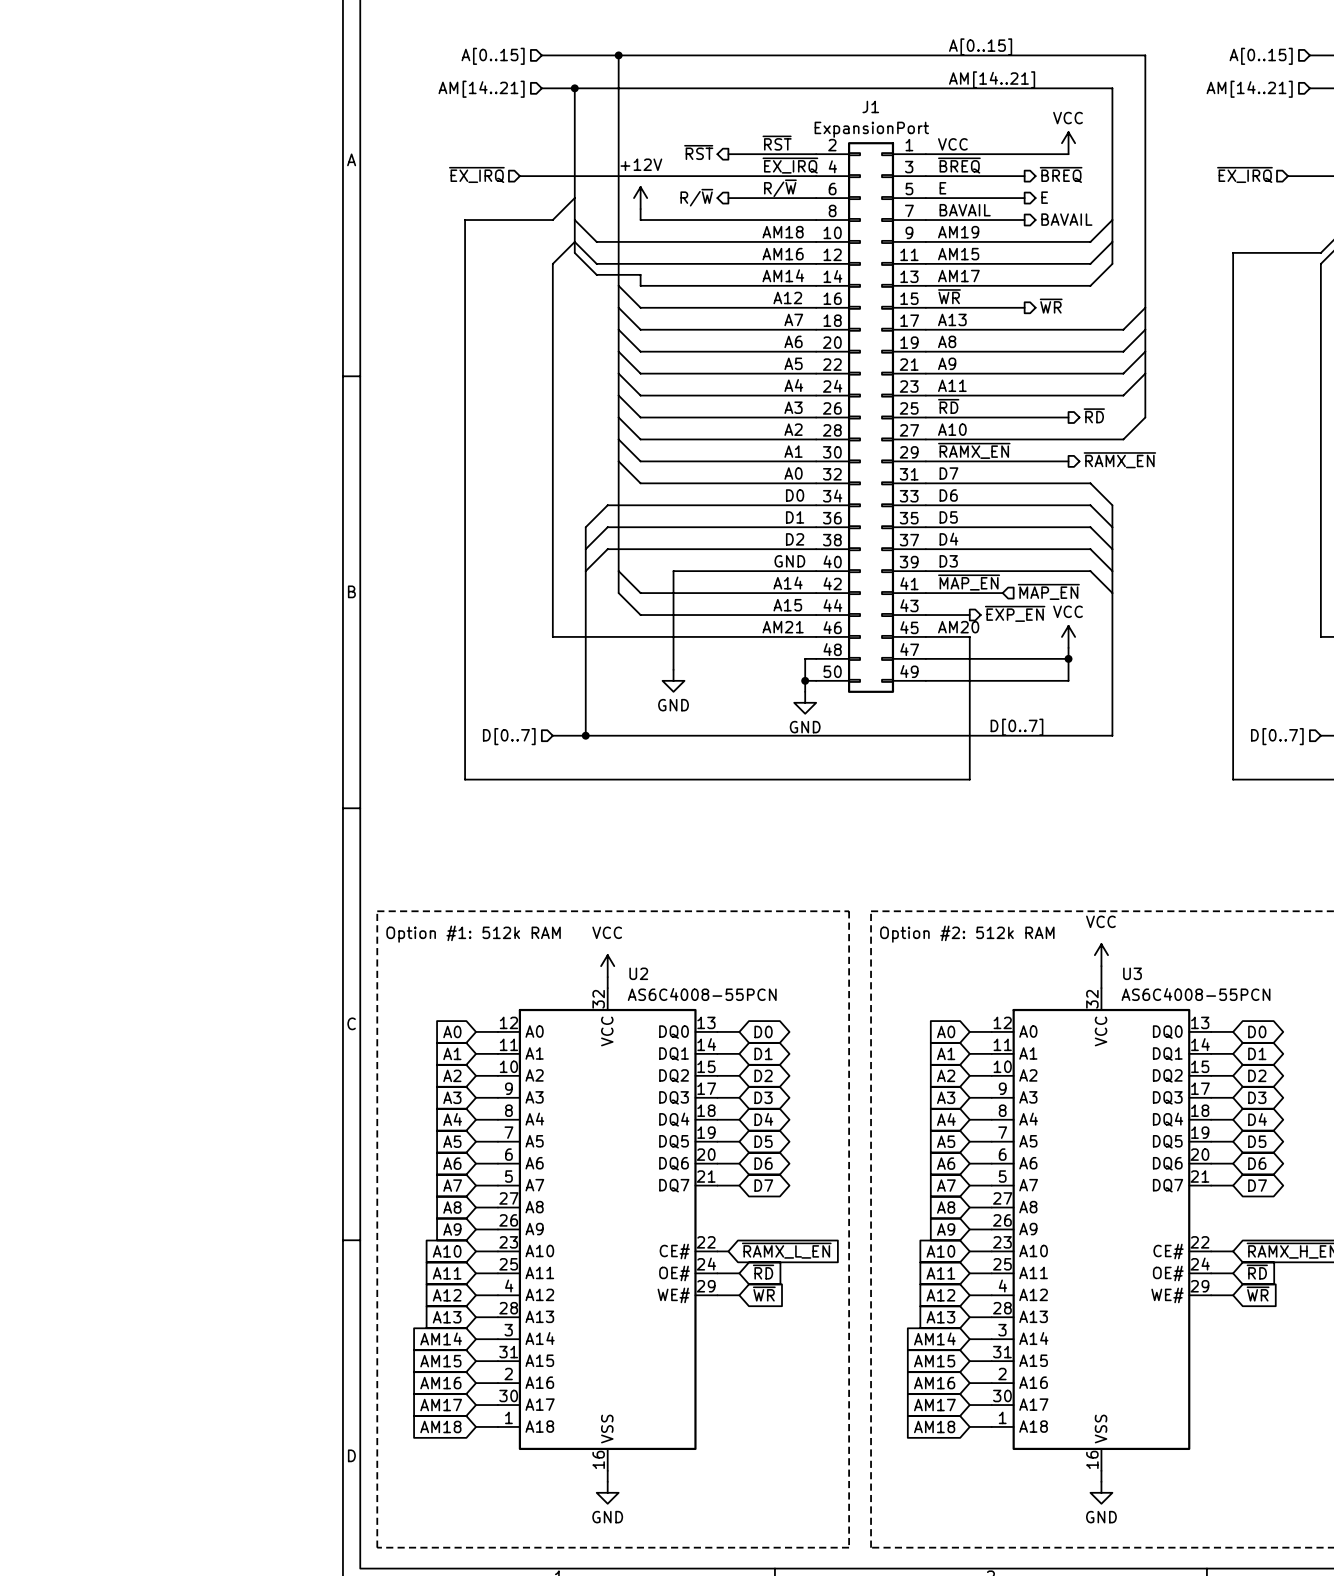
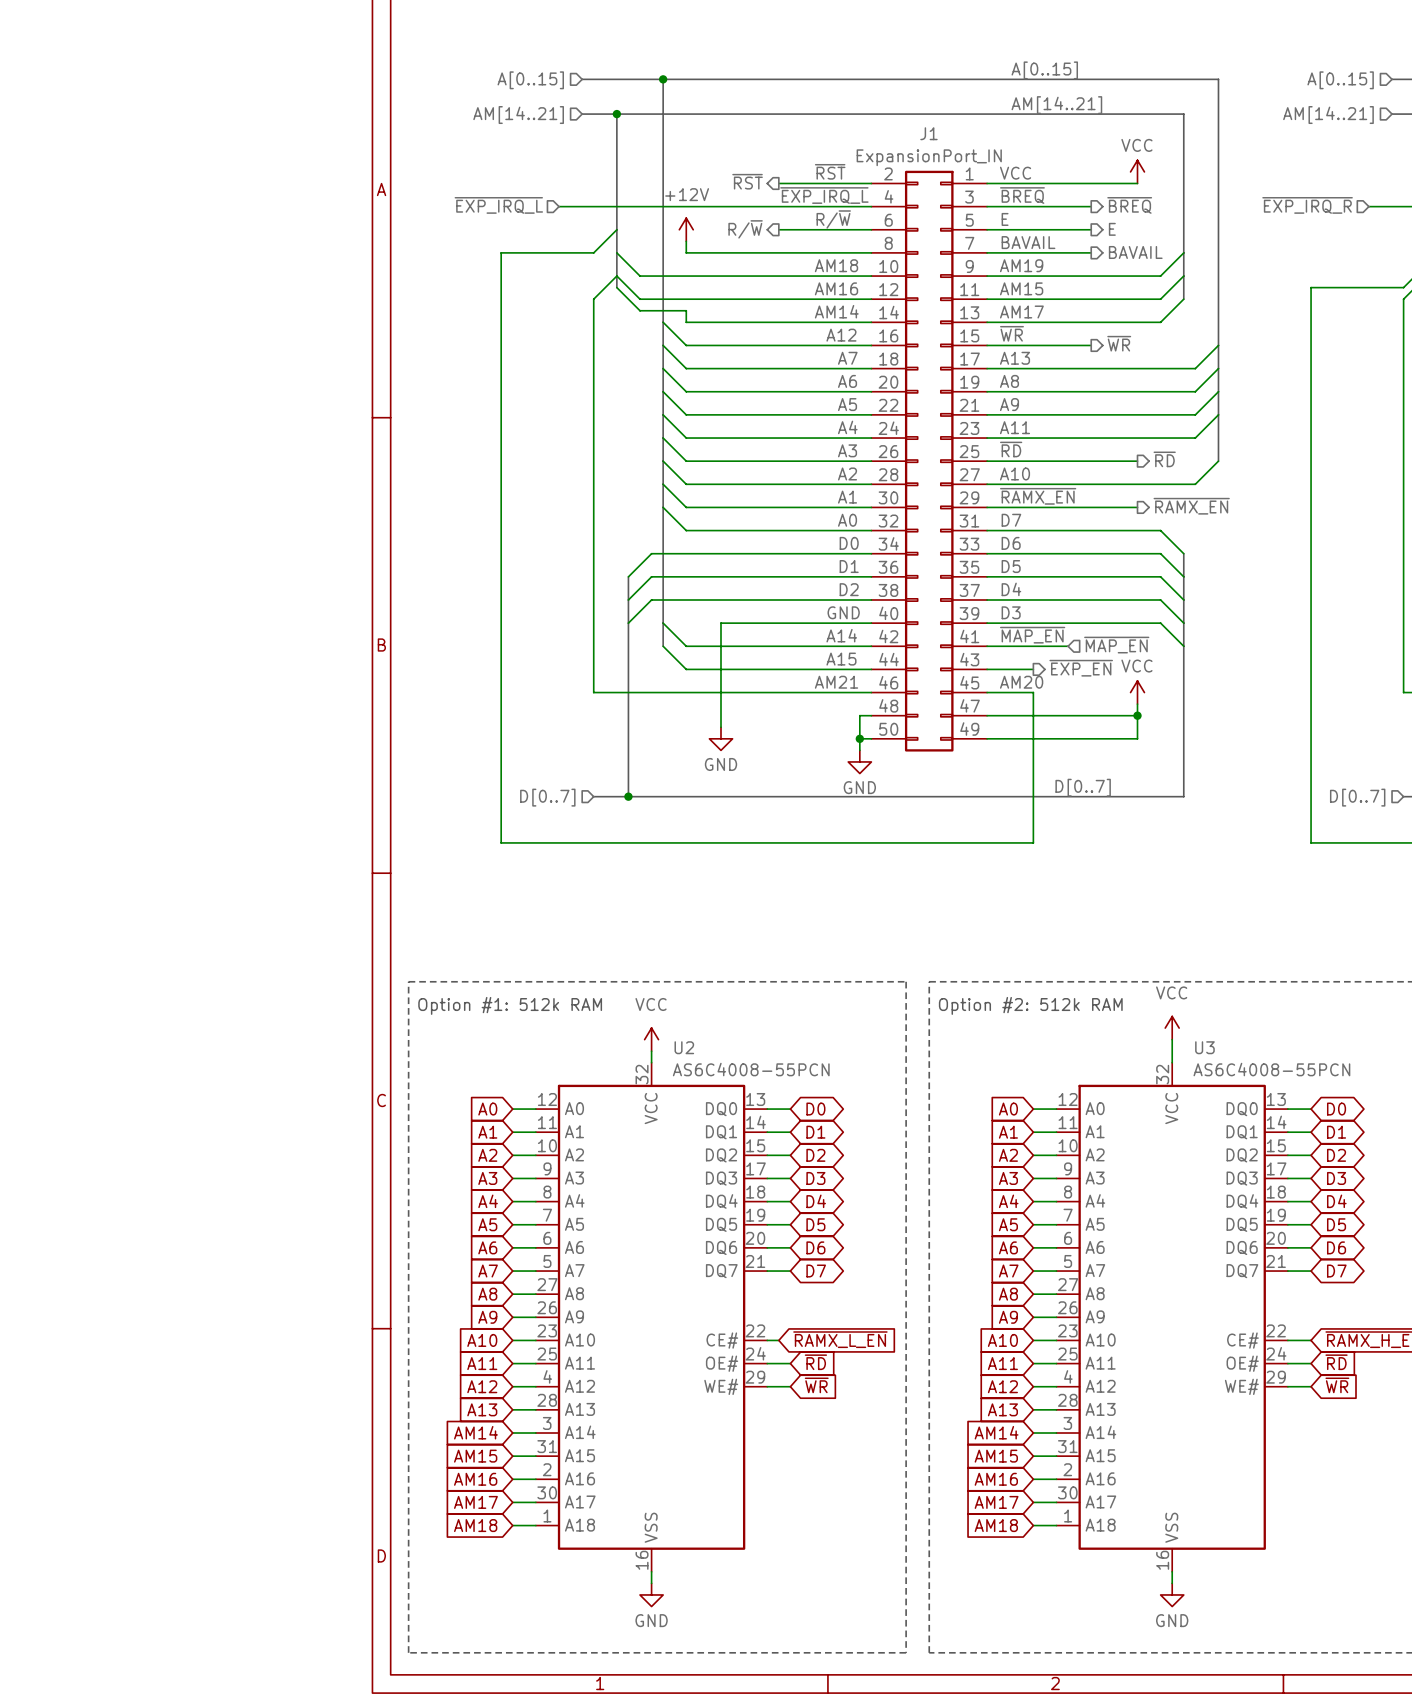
J1 value: ExpansionPort (871, 129) -> ExpansionPort_IN (929, 157)
label: ~{EX_IRQ} (790, 165) -> ~{EXP_IRQ_L} (824, 195)
hierarchical label: ~{EX_IRQ} (476, 174) -> ~{EXP_IRQ_L} (498, 205)
hierarchical label: ~{EX_IRQ} (1244, 174) -> ~{EXP_IRQ_R} (1307, 205)

